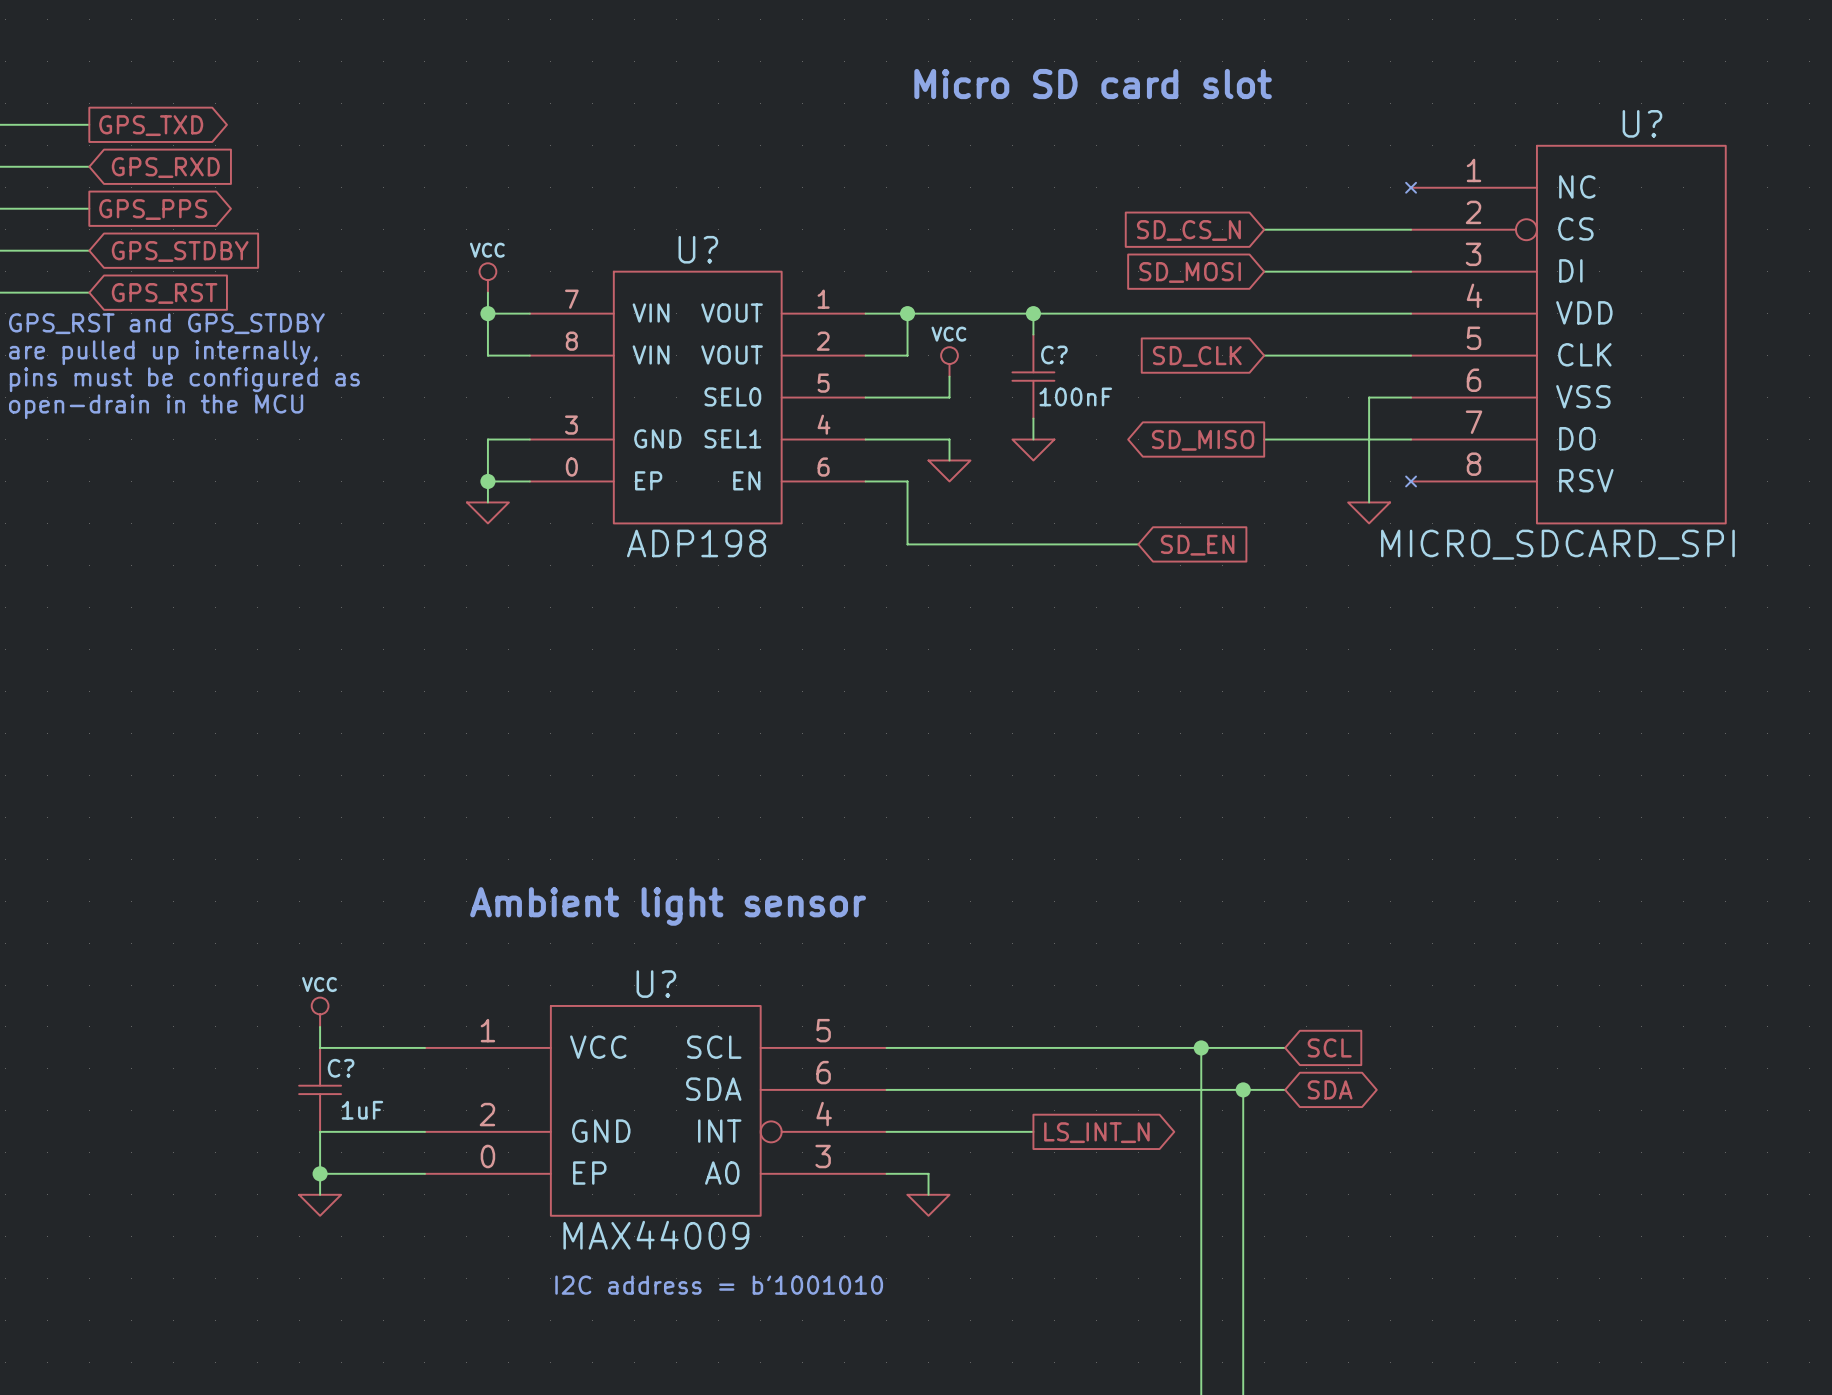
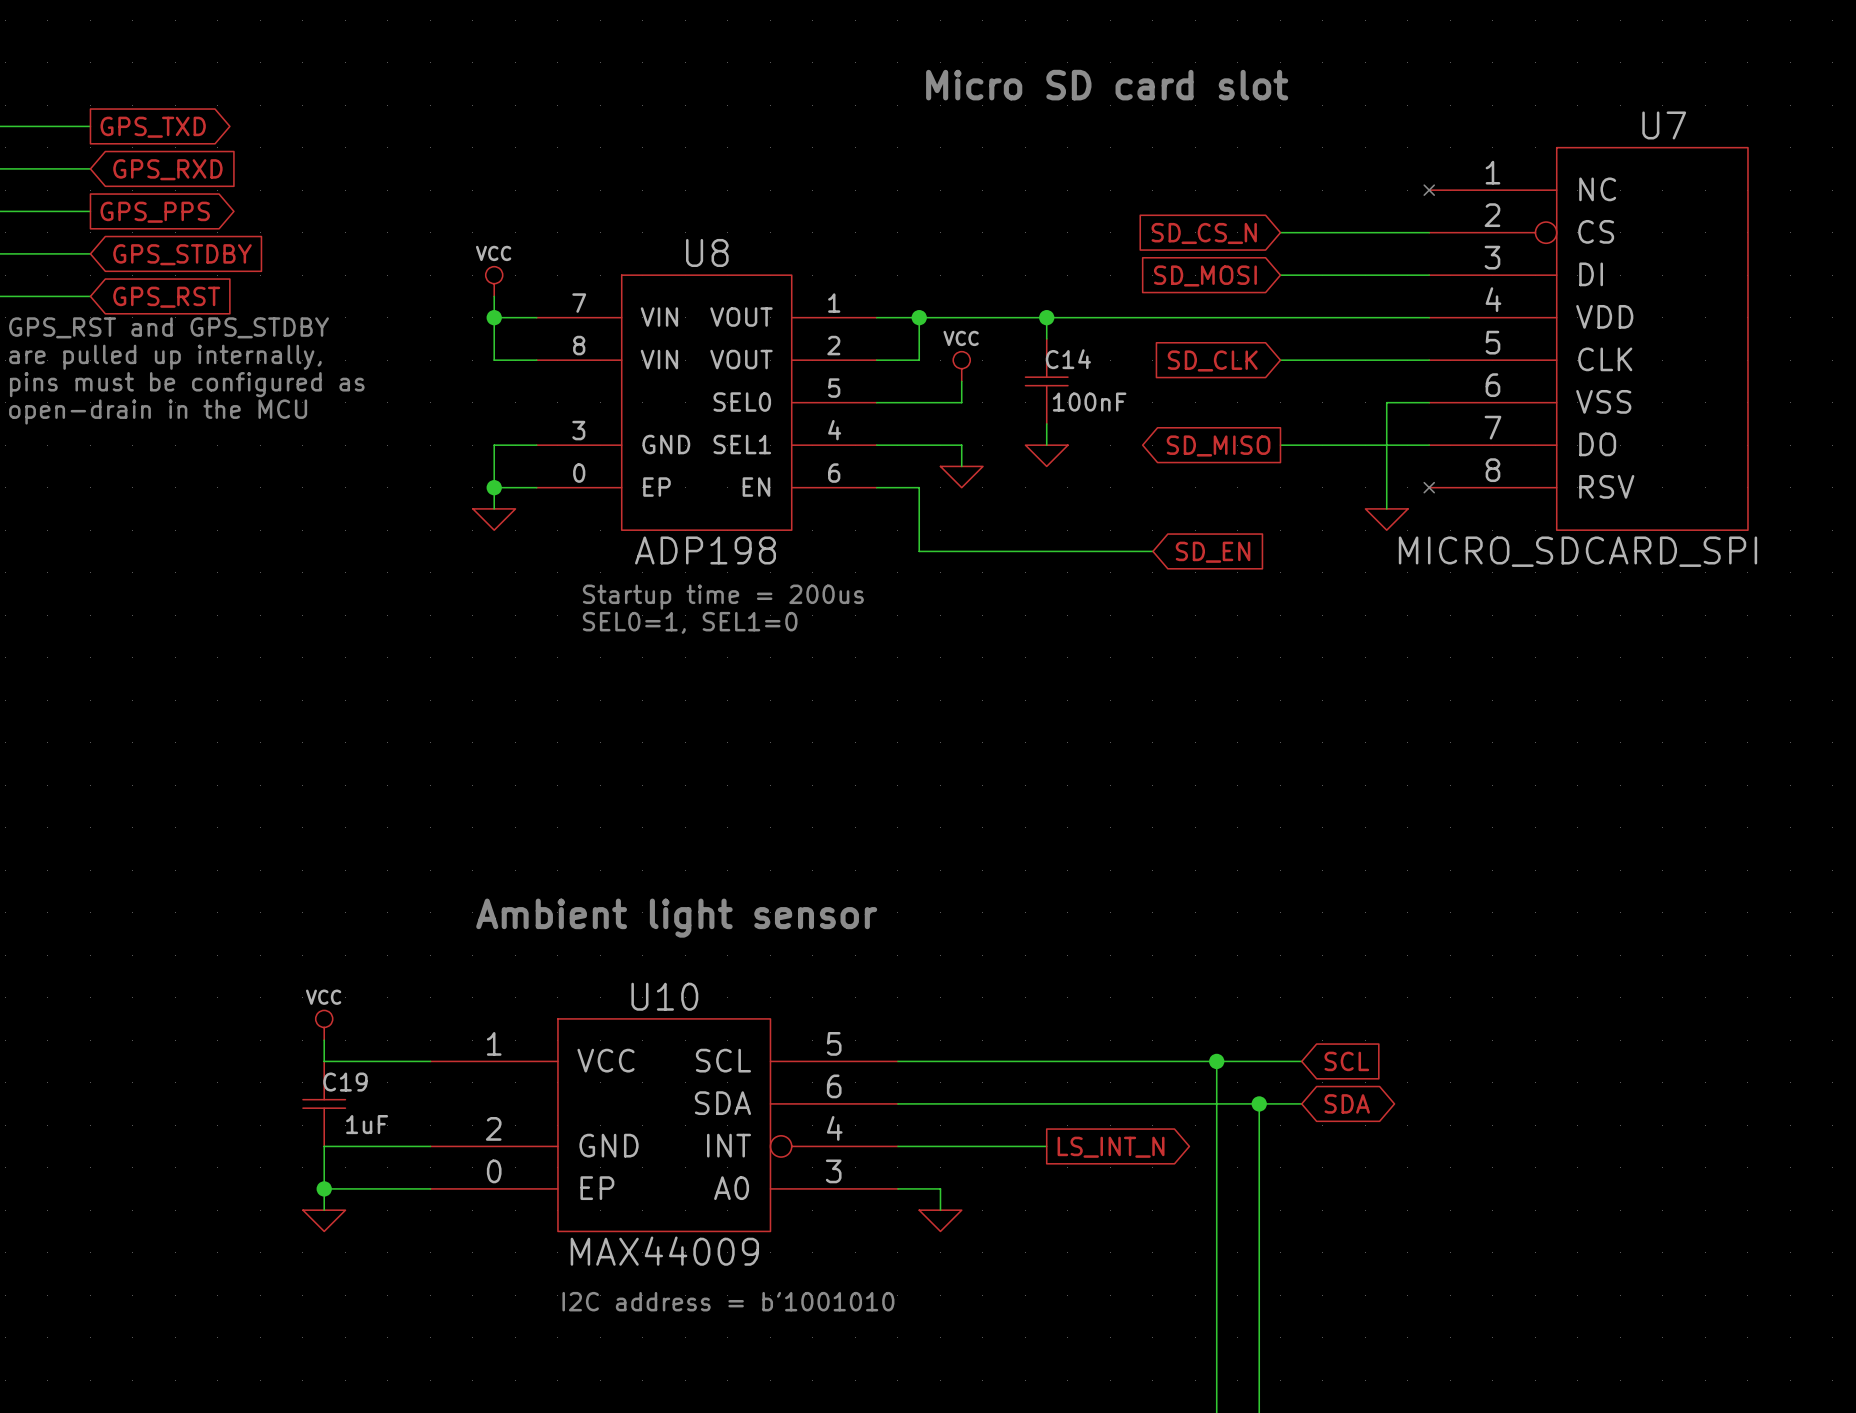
U? name: U? (1642, 123) -> U7 (1664, 125)
U? name: U? (698, 249) -> U8 (707, 252)
C? name: C? (1054, 354) -> C14 (1068, 359)
text: none -> Startup time = 200us (723, 597)
text: none -> SEL0=1, SEL1=0 (690, 622)
U? name: U? (656, 984) -> U10 (664, 996)
C? name: C? (341, 1068) -> C19 (345, 1082)

